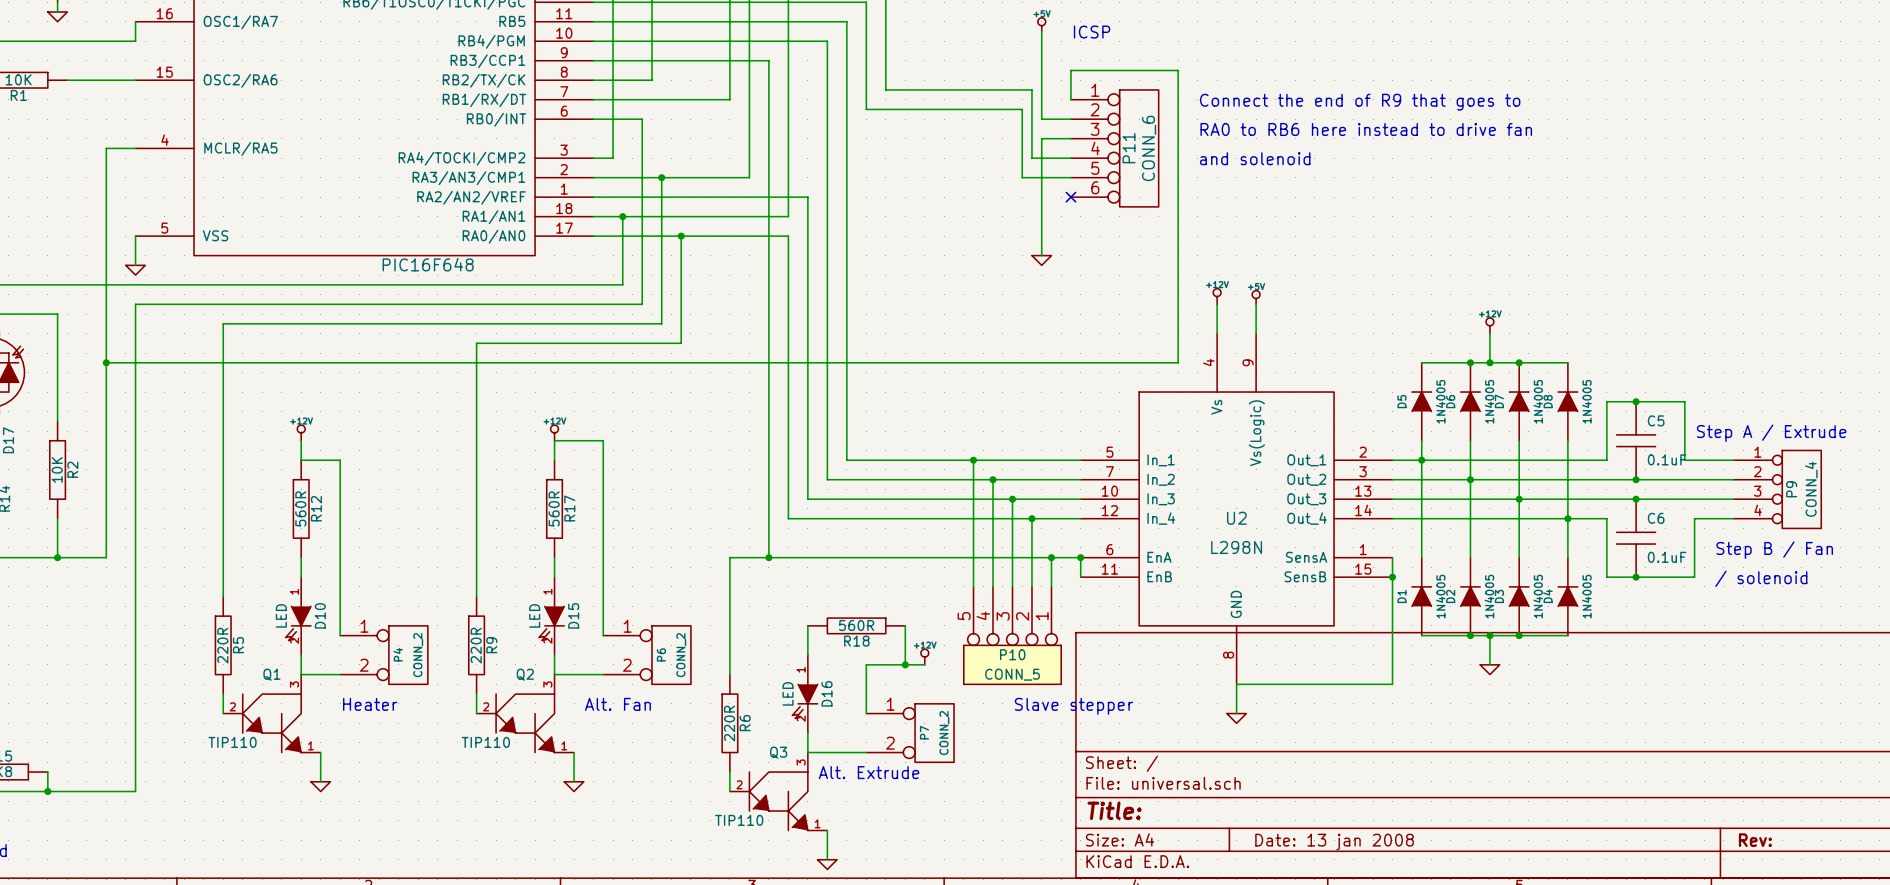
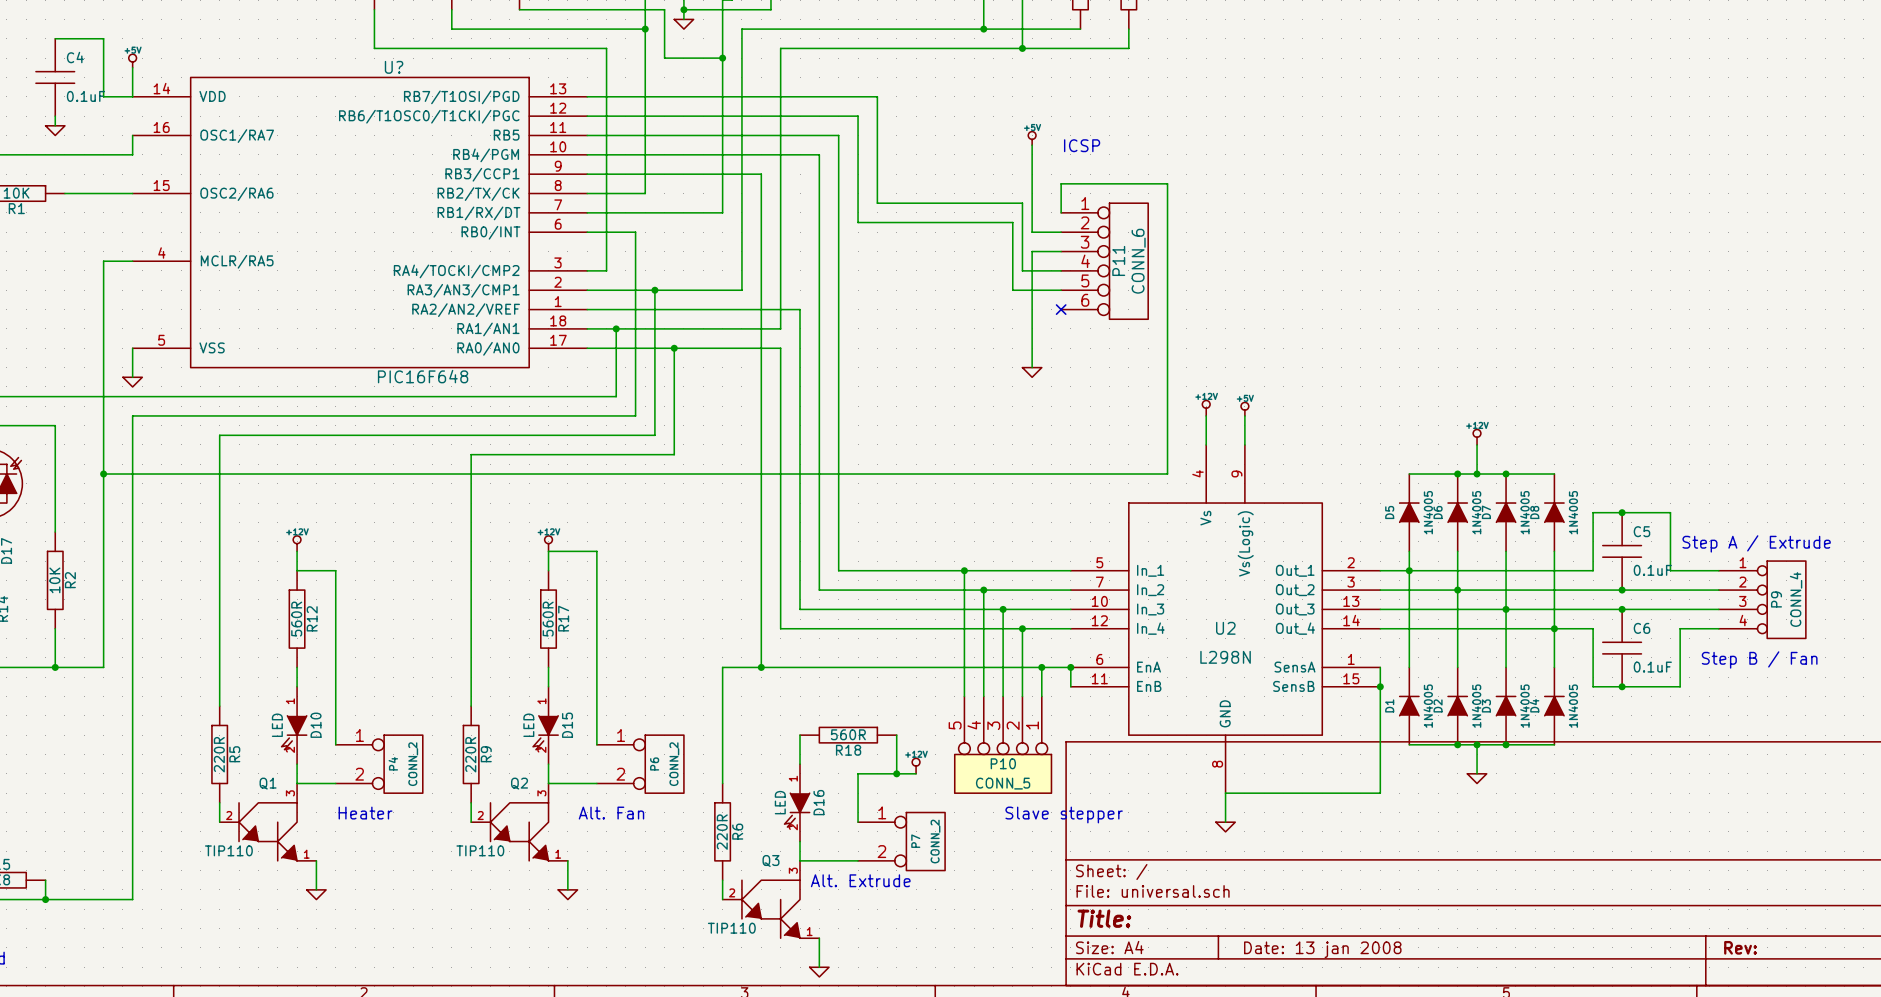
text: Connect the end of R9 that goes to (1360, 102) -> none
text: RA0 to RB6 here instead to drive fan (1366, 129) -> none
text: and solenoid (1255, 158) -> none
text: / solenoid (1761, 578) -> none

